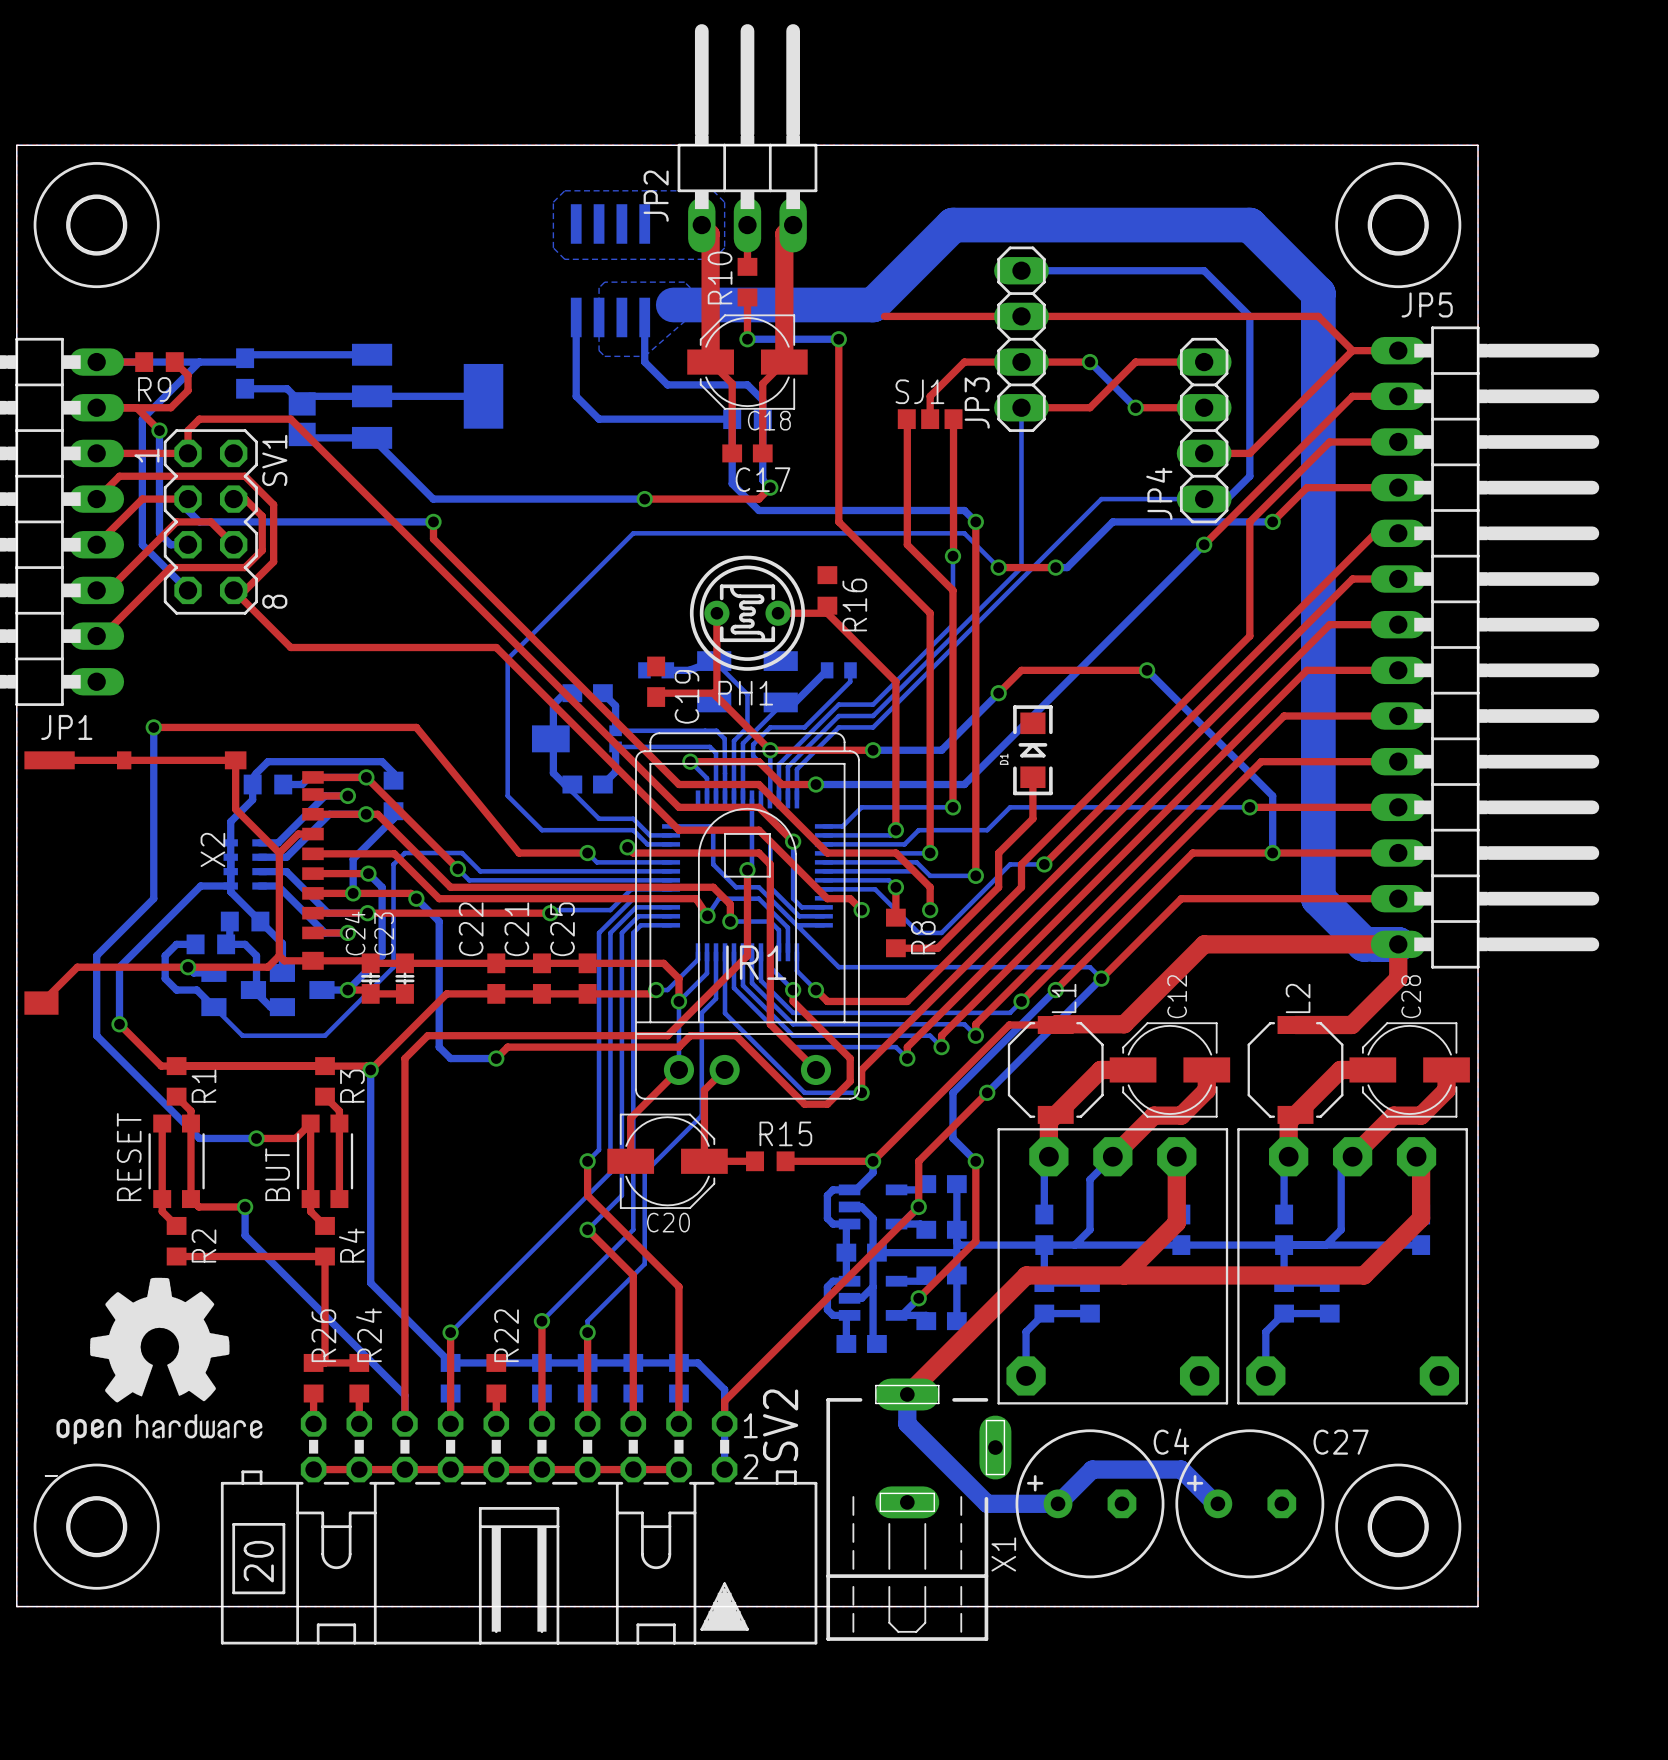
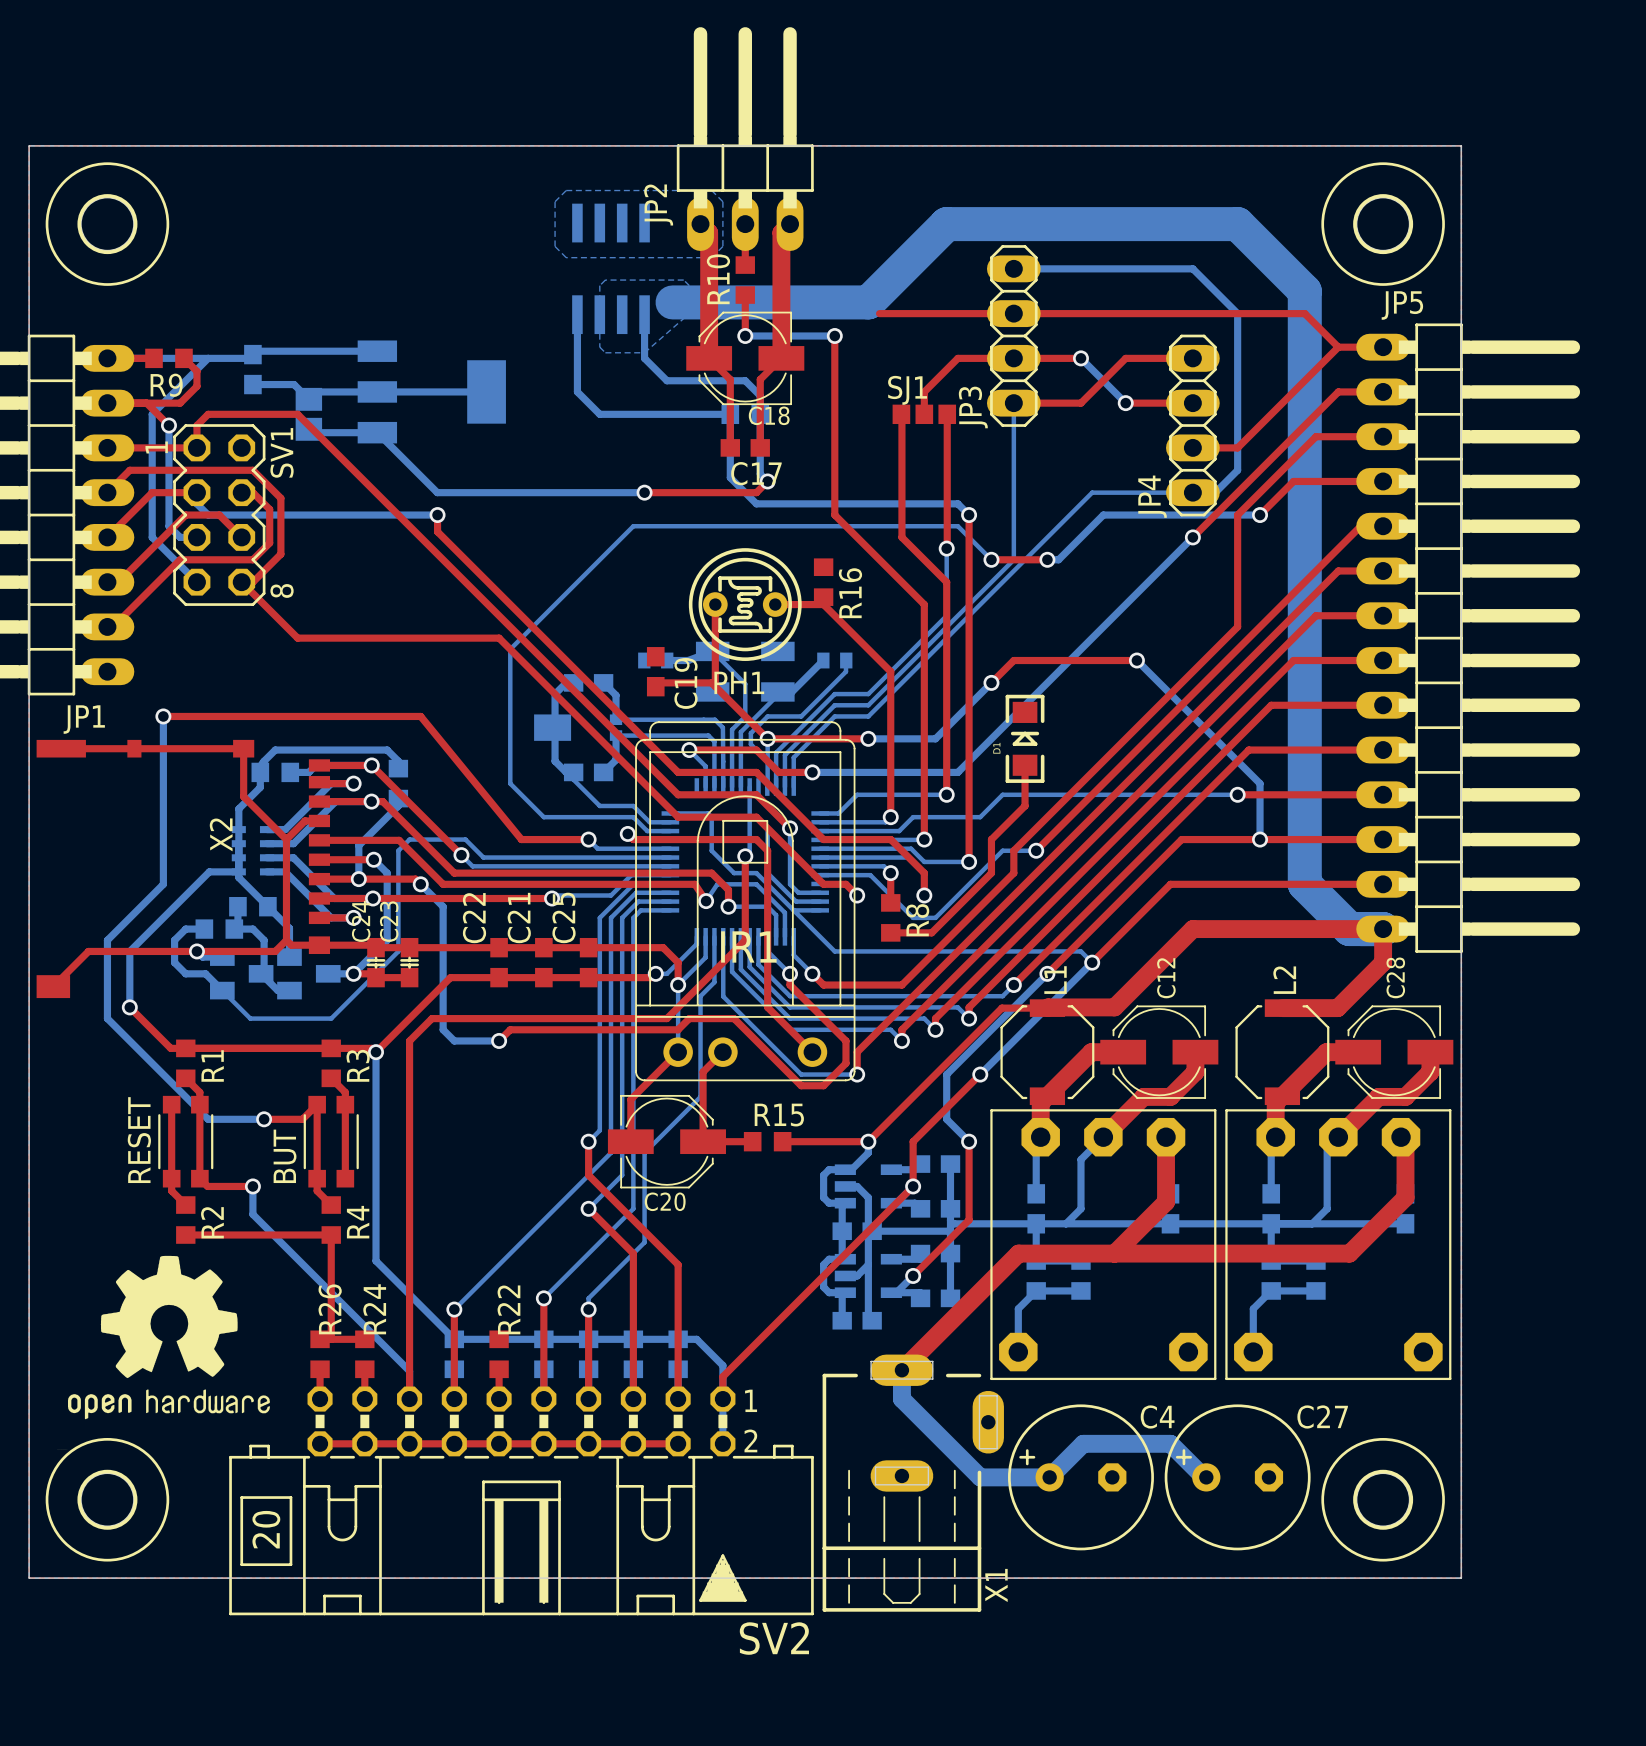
SV2 name rotation: 0° (780, 1425) -> 90° clockwise (774, 1638)
SV2 name position: SV2 (780, 1425) -> SV2 (774, 1638)
X1 name position: X1 (1003, 1554) -> X1 (996, 1585)

